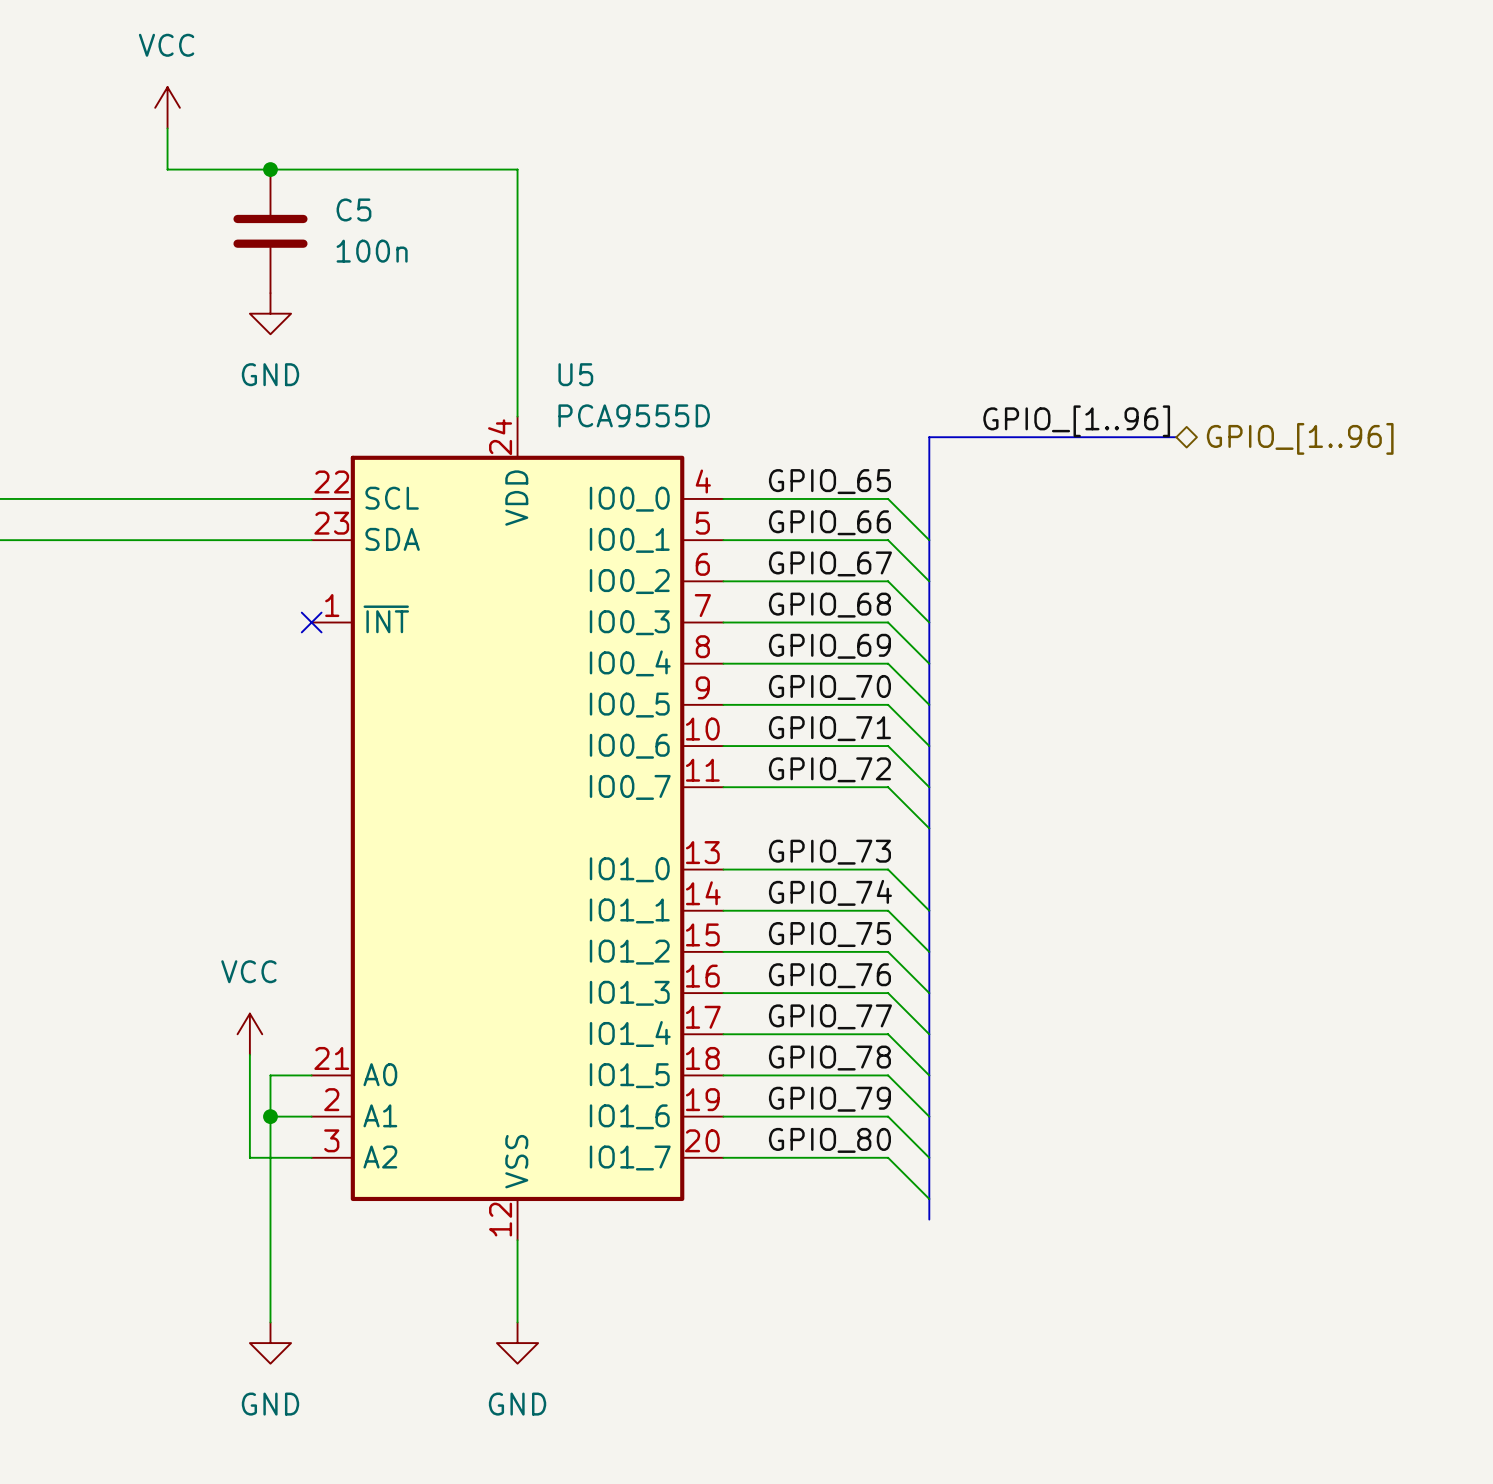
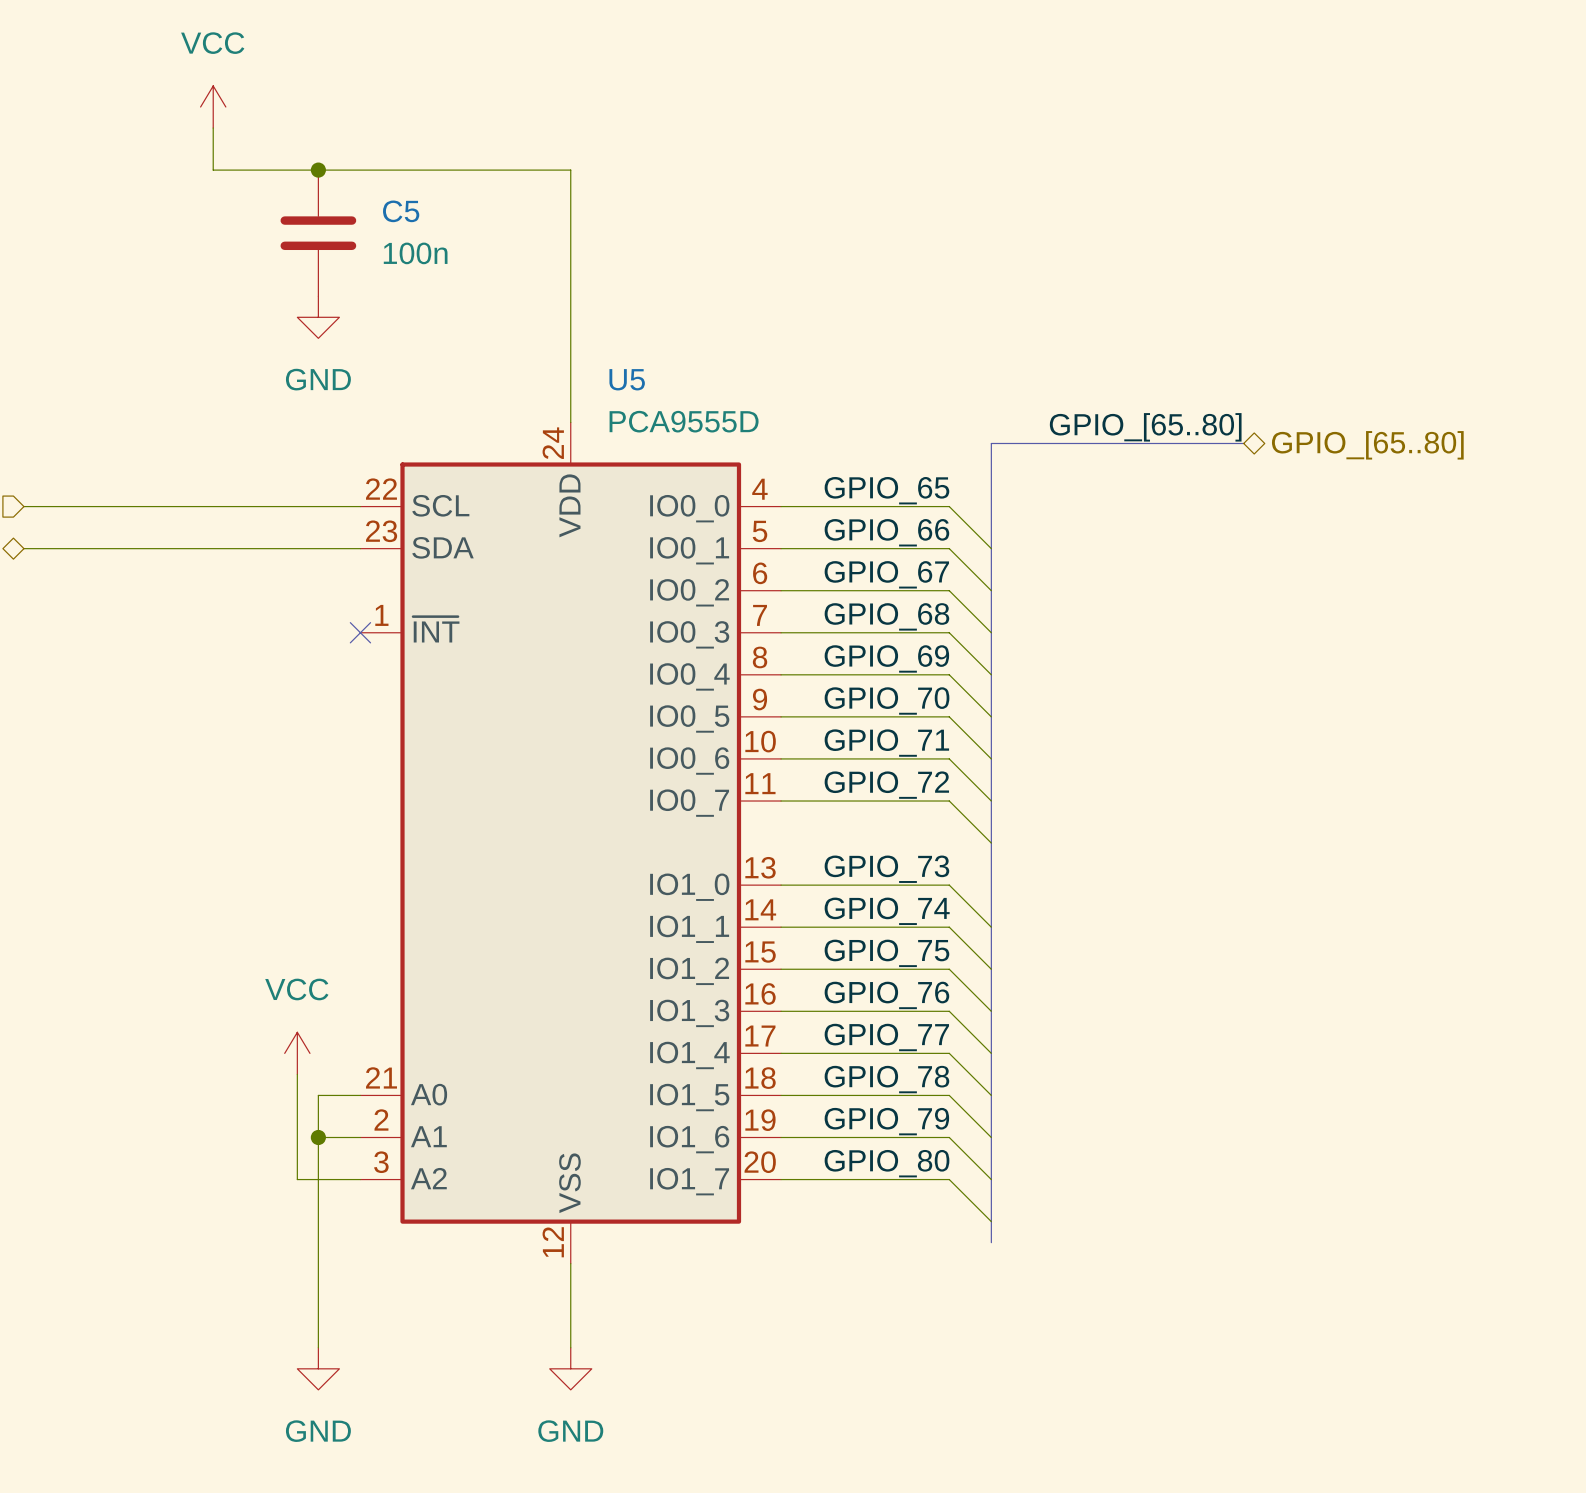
label: GPIO_[1..96] (1076, 421) -> GPIO_[65..80] (1145, 427)
hierarchical label: GPIO_[1..96] (1300, 438) -> GPIO_[65..80] (1367, 445)

